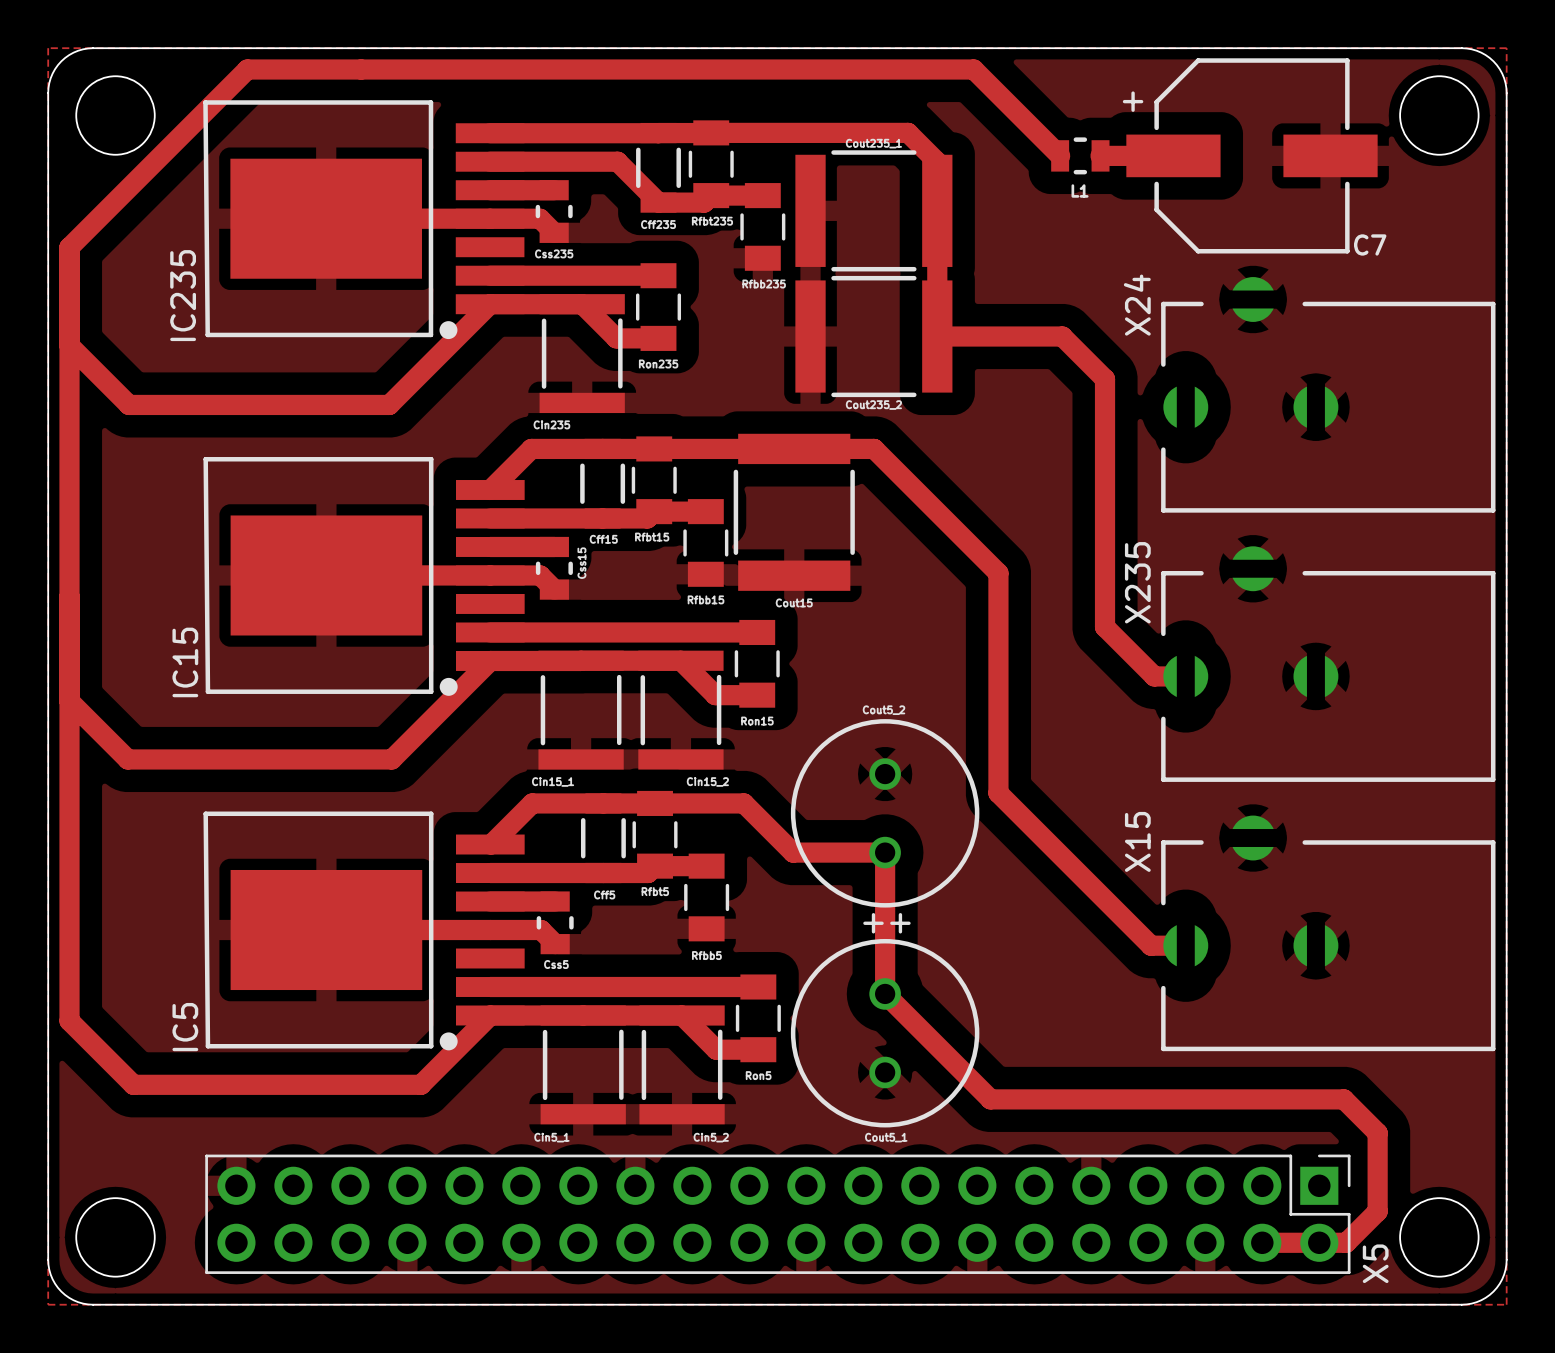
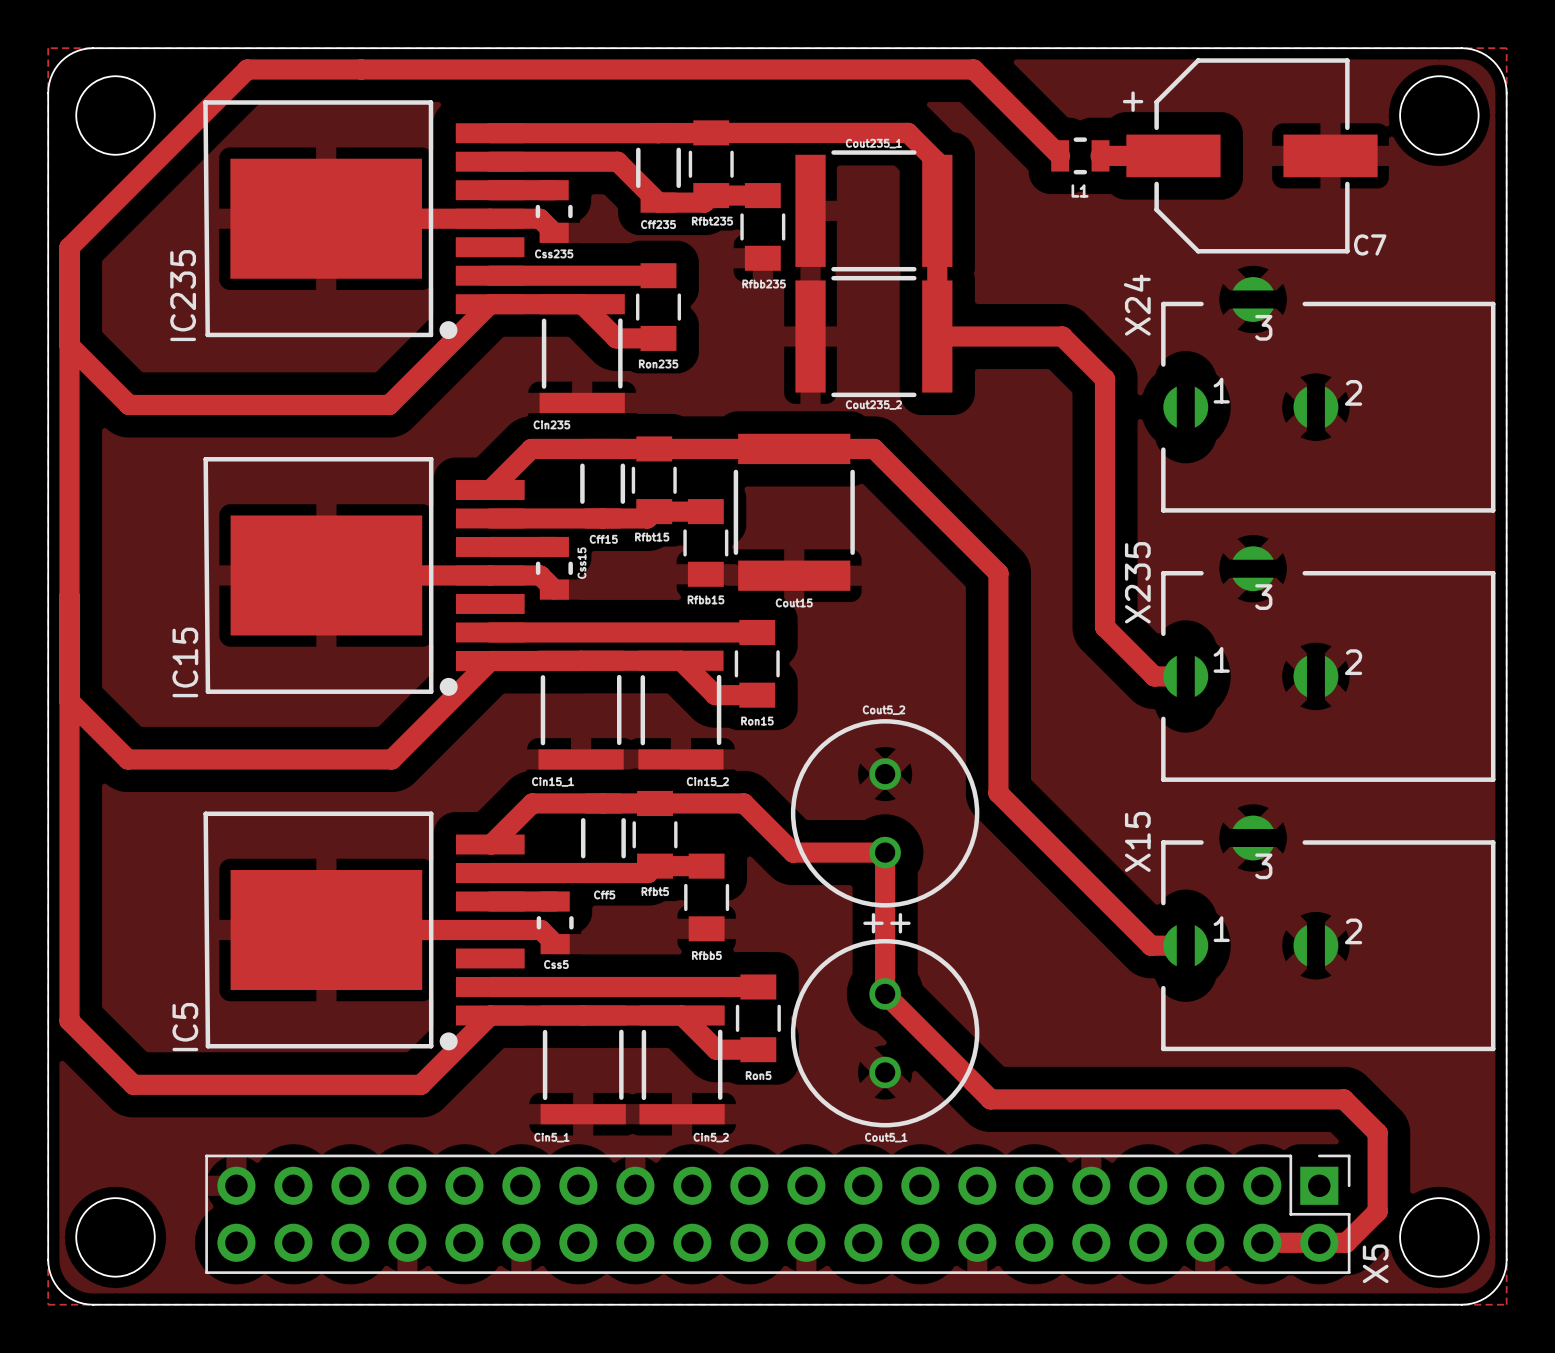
X24 text: none -> 3 (1263, 327)
X24 text: none -> 1 (1221, 390)
X24 text: none -> 2 (1353, 392)
X235 text: none -> 3 (1263, 597)
X235 text: none -> 1 (1221, 659)
X235 text: none -> 2 (1353, 662)
X15 text: none -> 3 (1263, 866)
X15 text: none -> 1 (1221, 929)
X15 text: none -> 2 (1353, 931)

